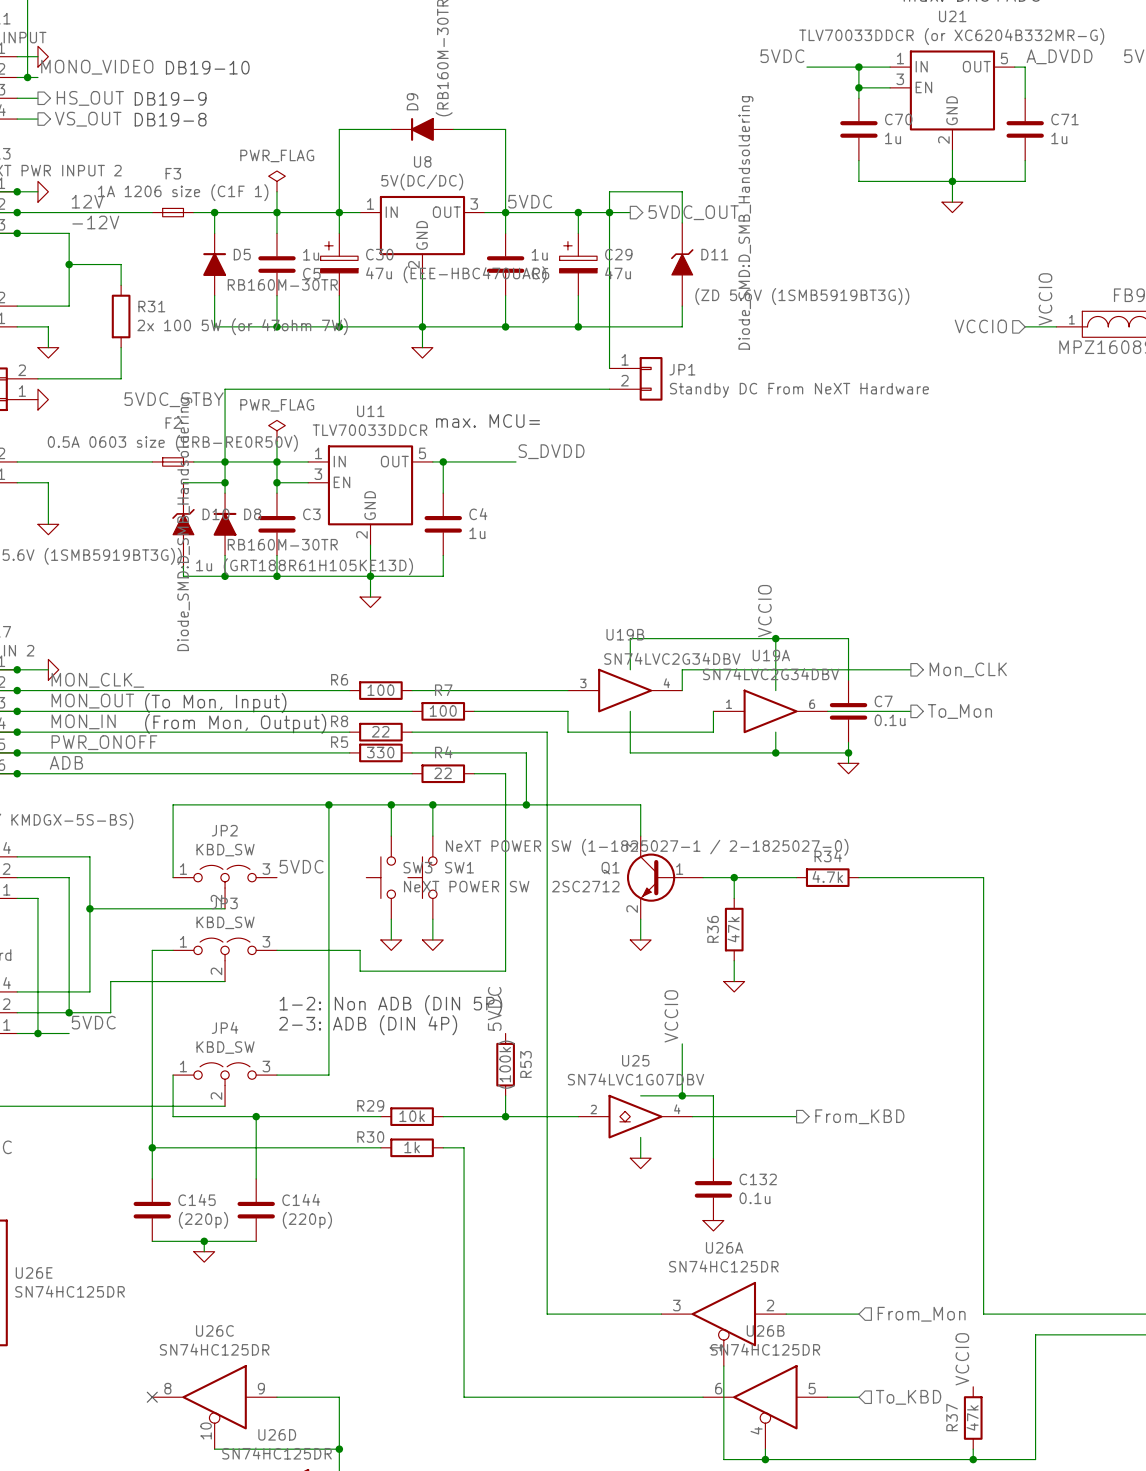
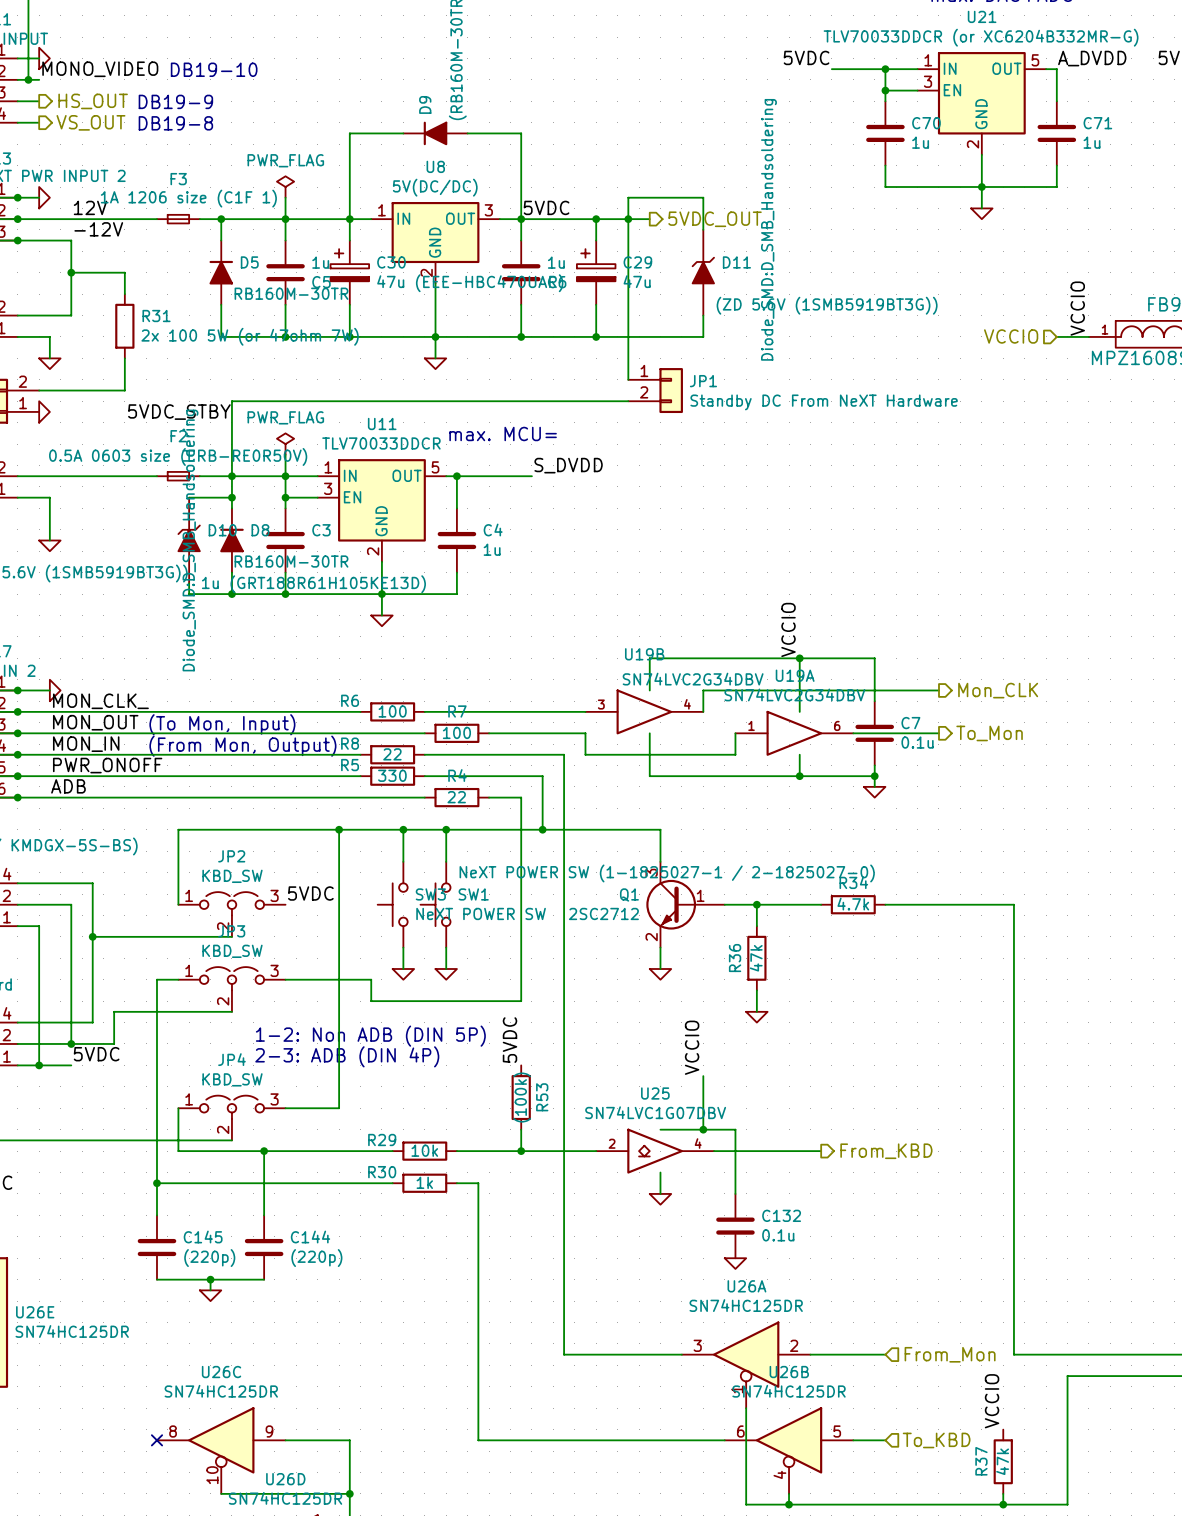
text position: 1-2: Non ADB (DIN 5P) (390, 1005) -> 1-2: Non ADB (DIN 5P) (370, 1036)
text position: 2-3: ADB (DIN 4P) (368, 1025) -> 2-3: ADB (DIN 4P) (347, 1056)

